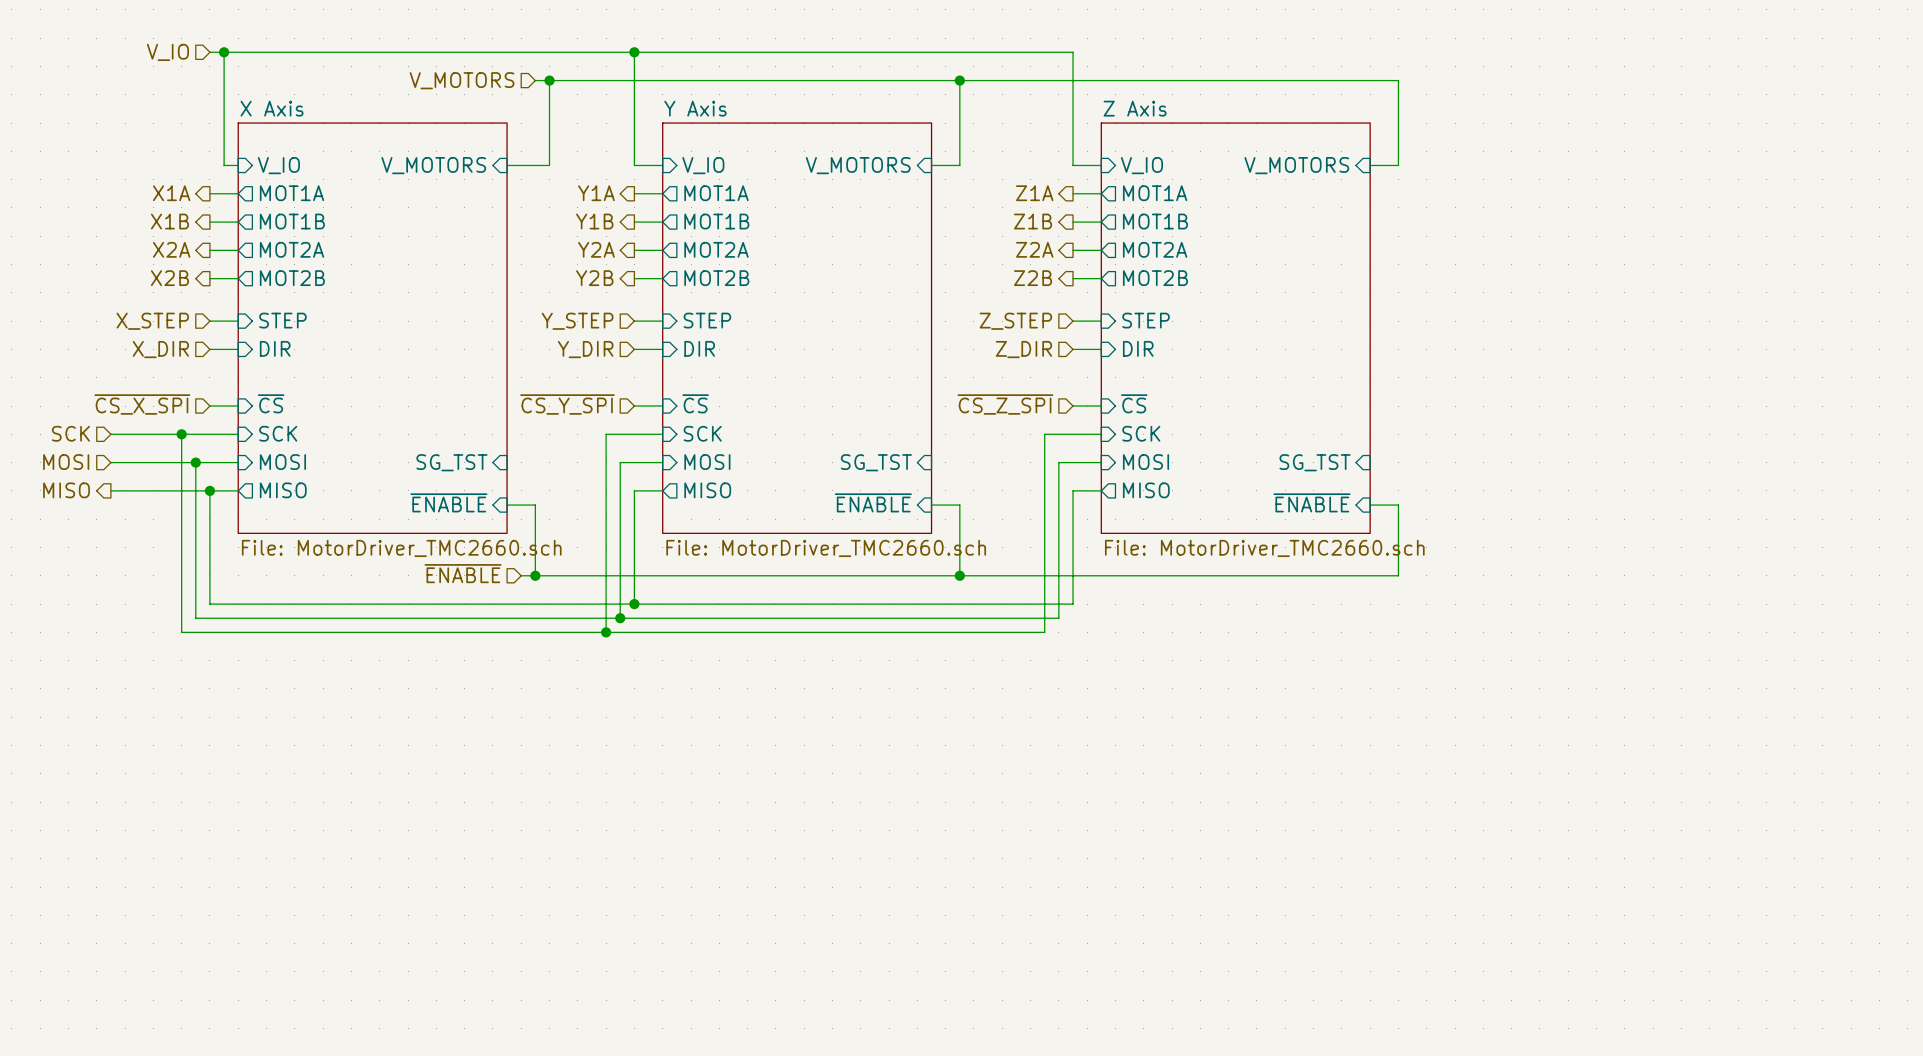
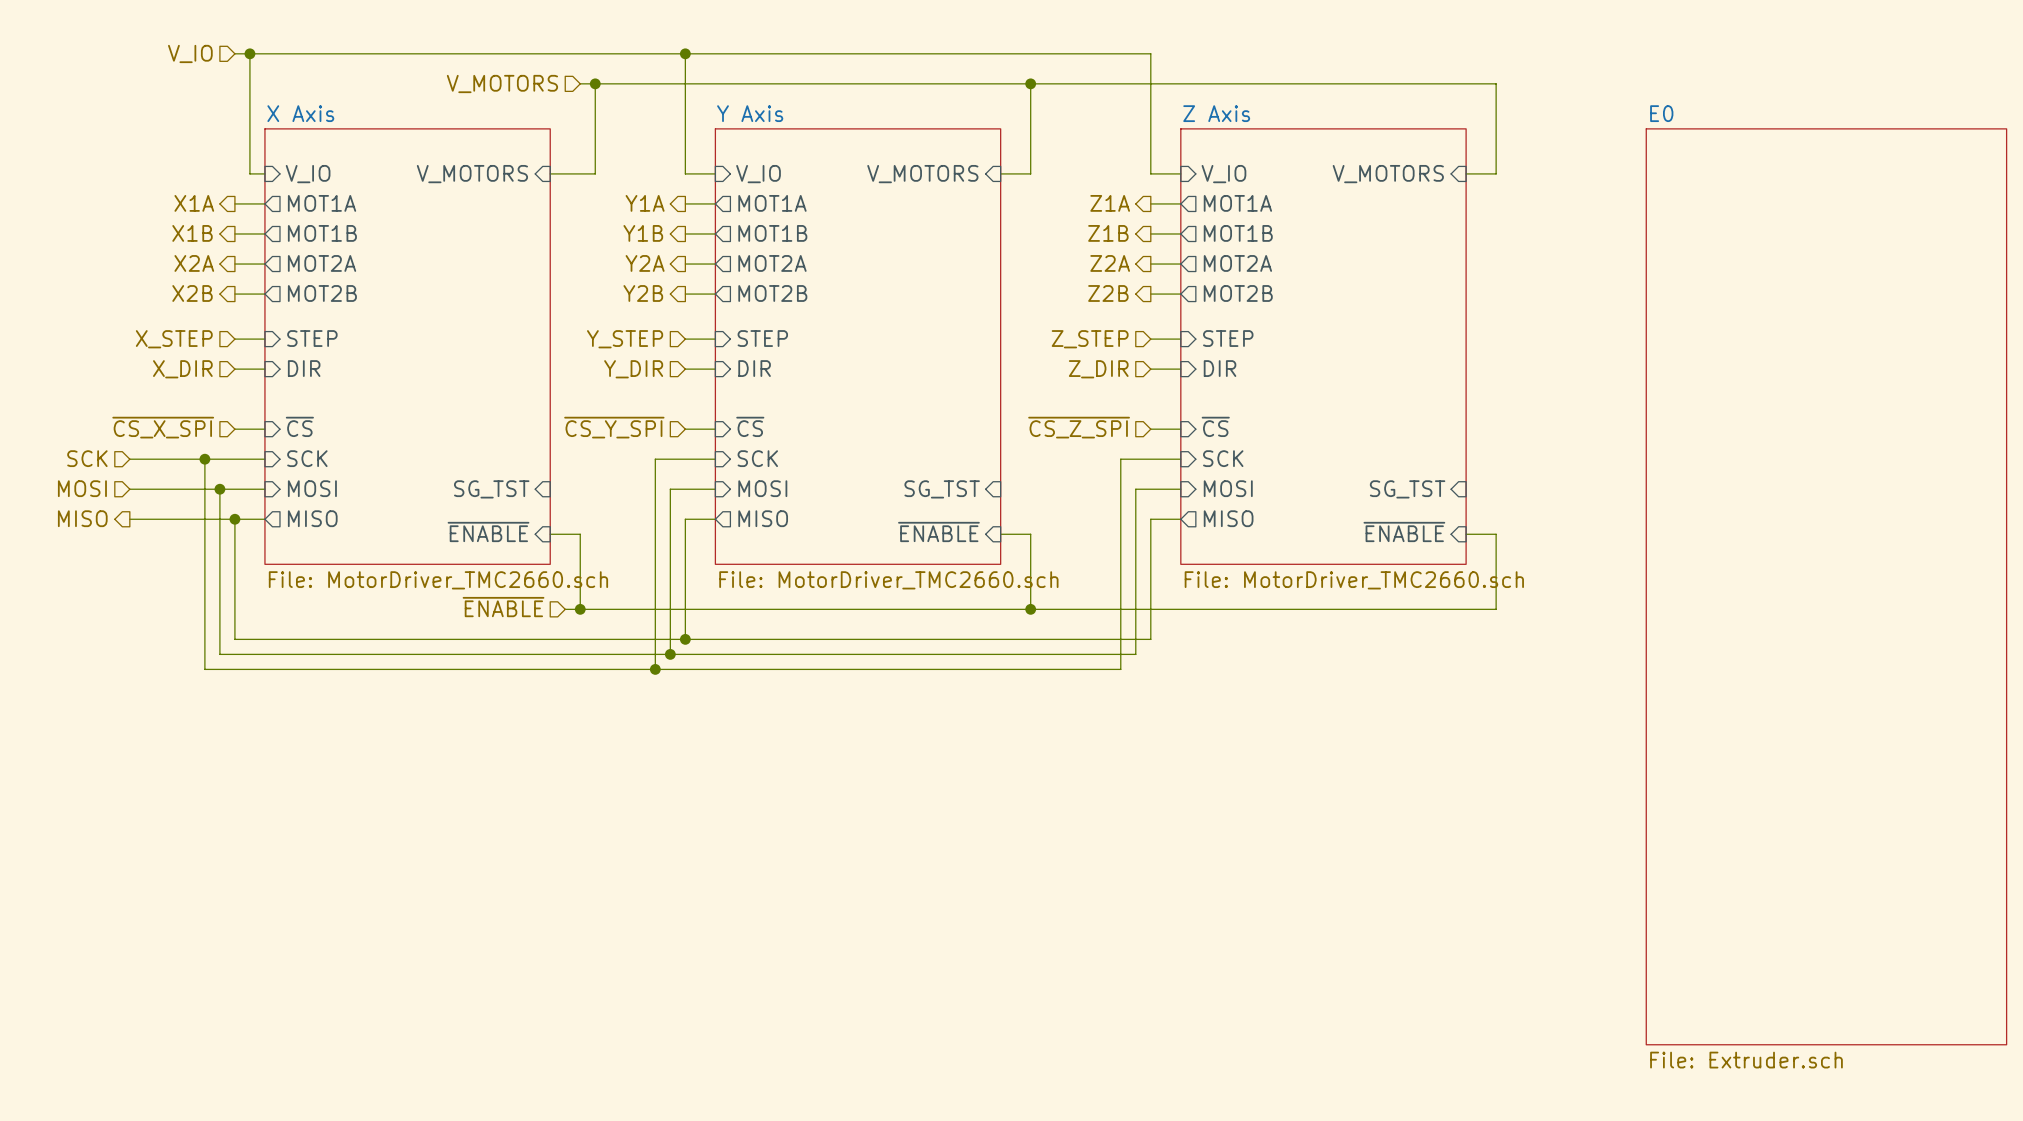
sheet E0: none -> File: Extruder.sch (1826, 586)

